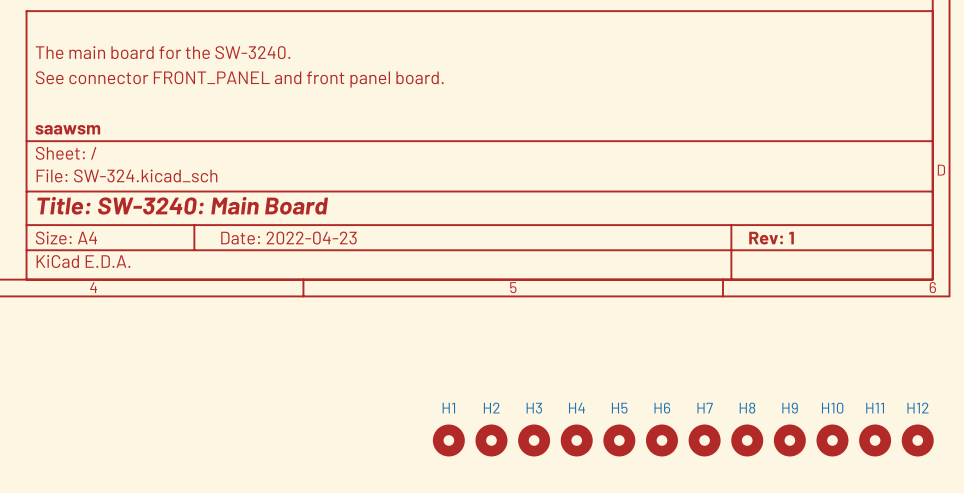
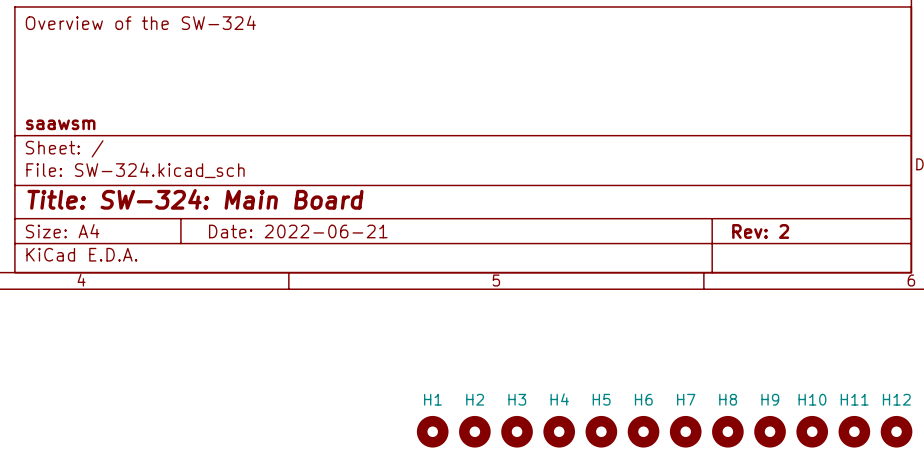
title block: none -> Overview of the SW-324 (140, 22)
title block: The main board for the SW-3240. (162, 52) -> none
title block: See connector FRONT_PANEL and front panel board. (239, 79) -> none
title block: Title: SW-3240: Main Board (182, 205) -> Title: SW-324: Main Board (195, 199)
title block: Date: 2022-04-23 (288, 238) -> Date: 2022-06-21 (298, 231)
title block: Rev: 1 (771, 238) -> Rev: 2 (760, 231)

